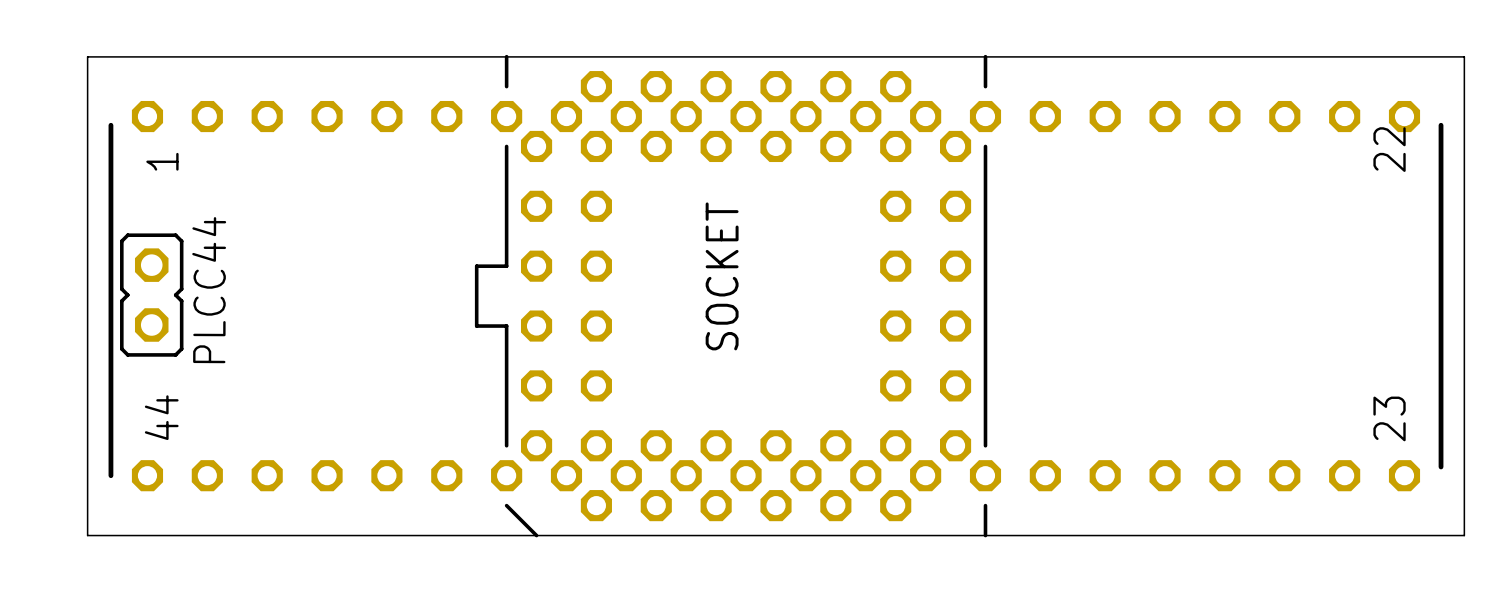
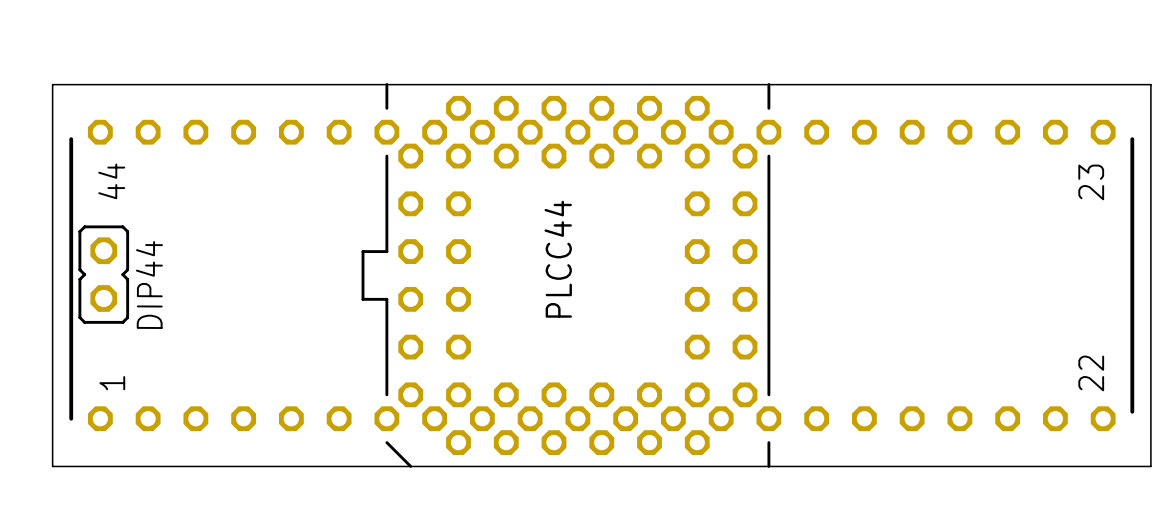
PLCC44 text: 22 (1389, 149) -> none
PLCC44 text: 1 (162, 161) -> none
PLCC44 text: none -> 44 (111, 181)
PLCC44 text: none -> 23 (1091, 182)
SOCKET name: SOCKET (722, 276) -> PLCC44 (558, 259)
PLCC44 name: PLCC44 (209, 290) -> DIP44 (149, 285)
PLCC44 text: 44 (161, 417) -> 1 (112, 383)
PLCC44 text: 23 (1389, 418) -> 22 (1091, 373)

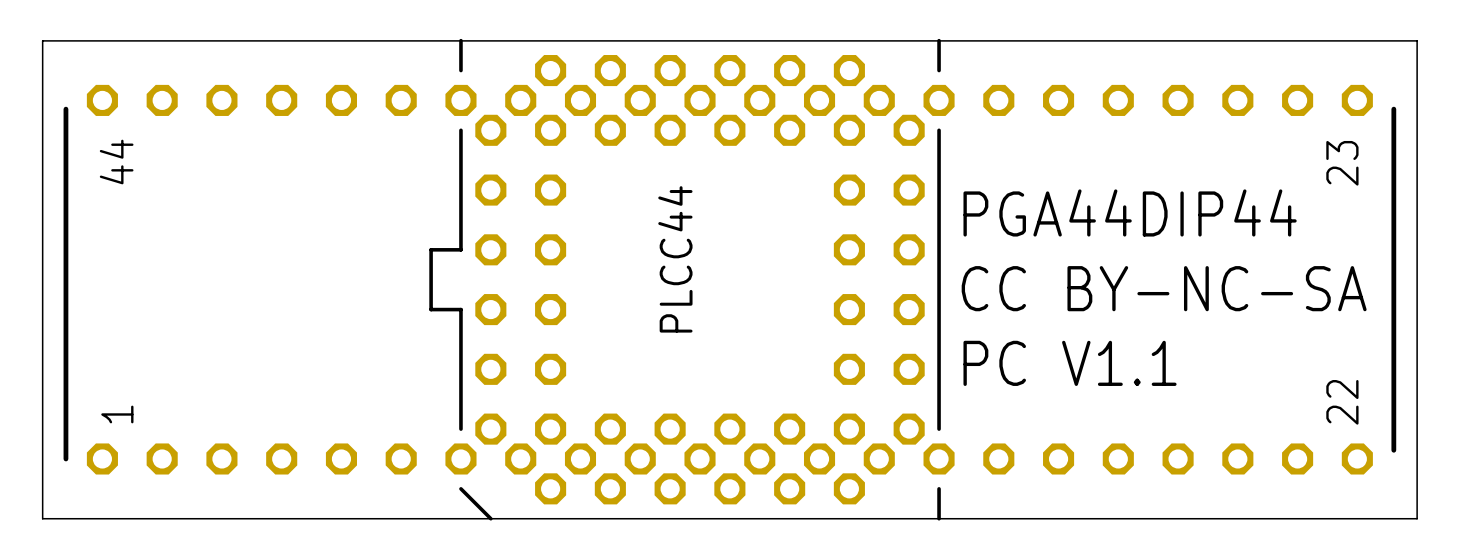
text: none -> PGA44DIP44 (1130, 212)
part: (103, 274) -> none
text: none -> CC BY-NC-SA (1164, 288)
DIP44 name: DIP44 (149, 285) -> none
text: none -> PC V1.1 (1070, 363)

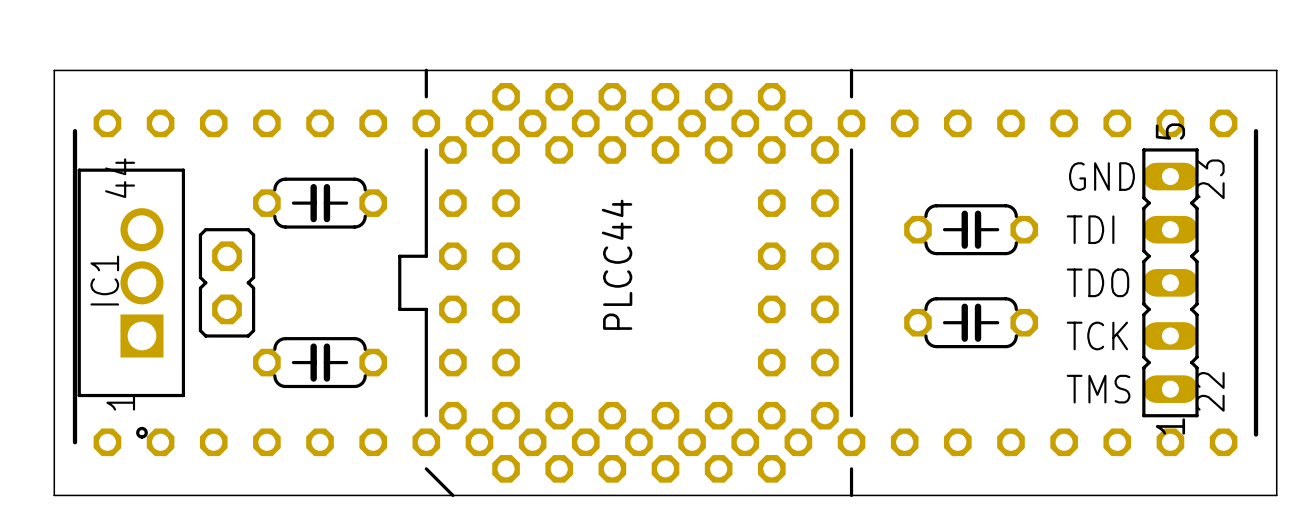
text: none -> GND (1101, 176)
part: none -> (320, 203)
text: PGA44DIP44 (1130, 212) -> none
part: none -> (971, 229)
text: none -> TDI (1090, 229)
part: none -> (227, 282)
text: none -> TDO (1097, 282)
part: none -> (1170, 282)
text: CC BY-NC-SA (1164, 288) -> none
IC1: none -> (131, 303)
part: none -> (971, 322)
text: none -> TCK (1097, 335)
text: PC V1.1 (1070, 363) -> none
part: none -> (320, 362)
text: none -> TMS (1098, 389)

